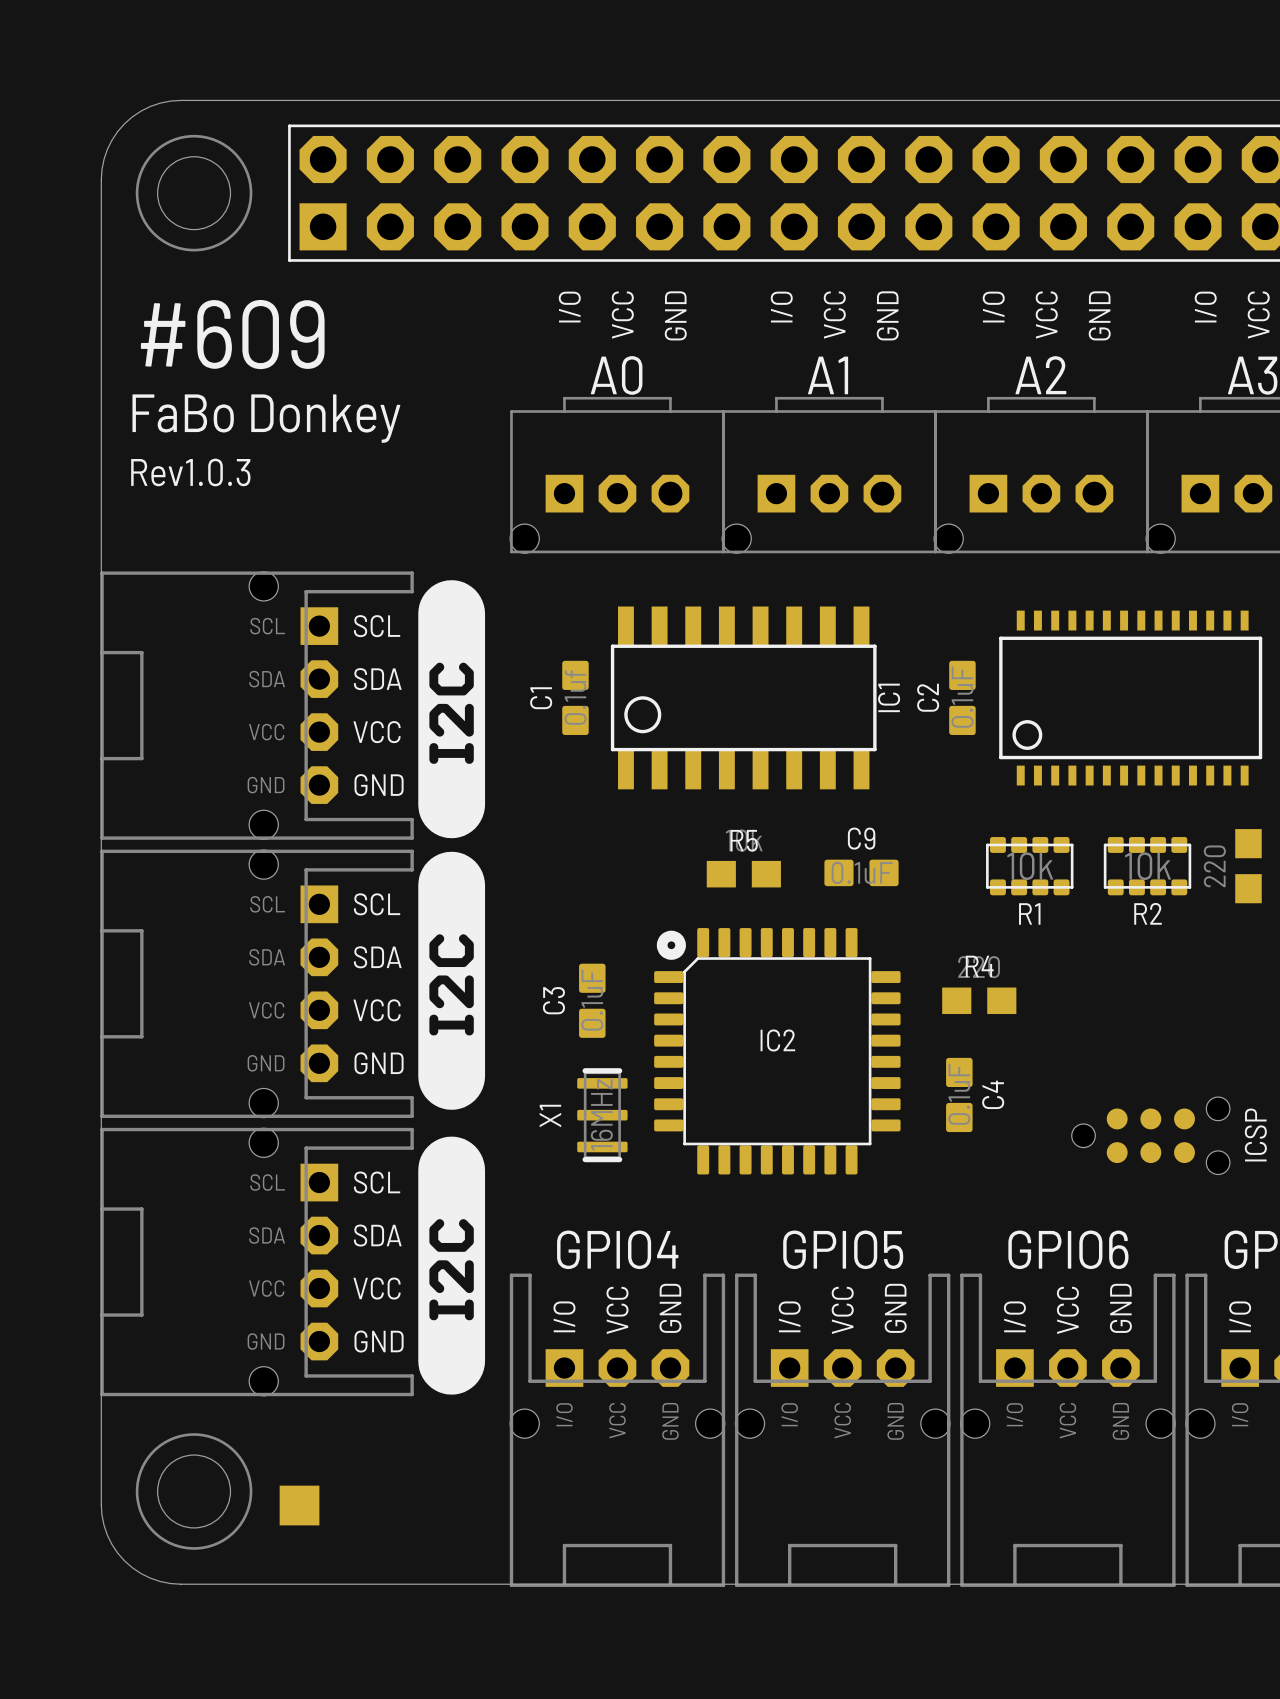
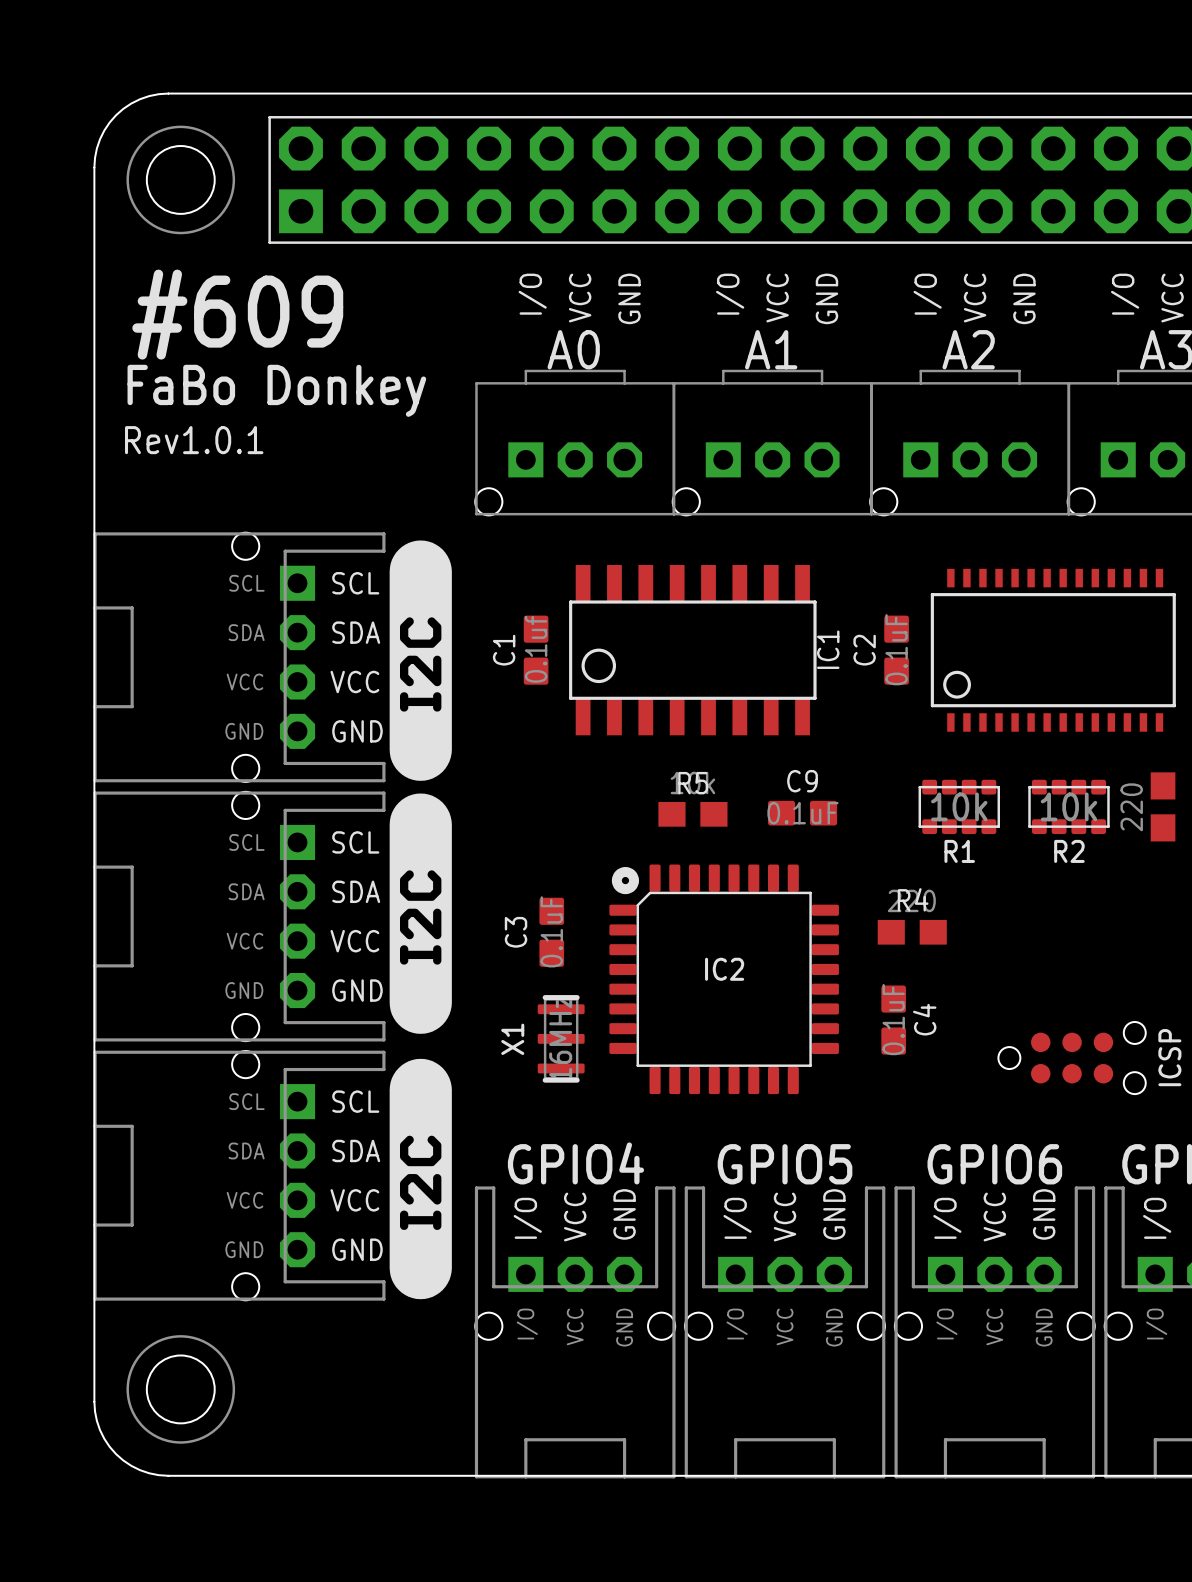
text: Rev1.0.3 (190, 472) -> Rev1.0.1 (194, 440)
part: (299, 1505) -> none

